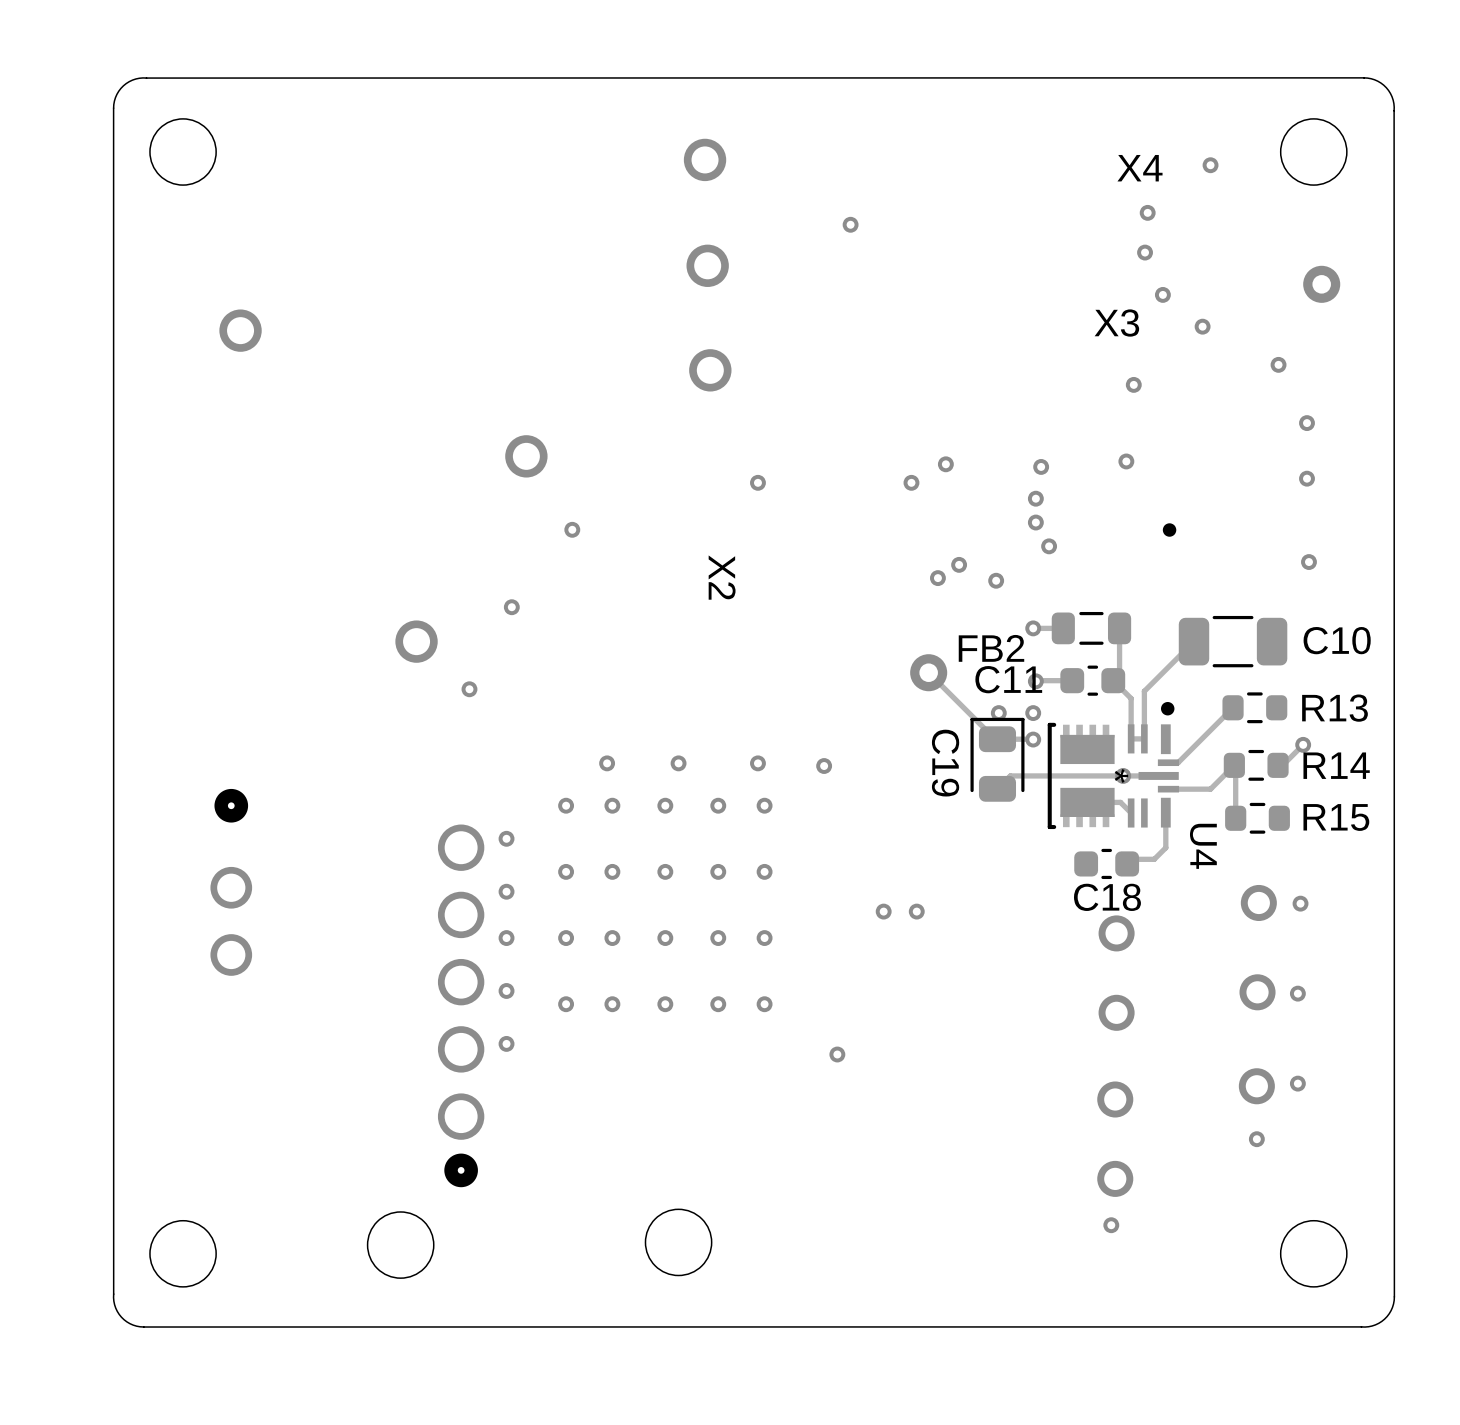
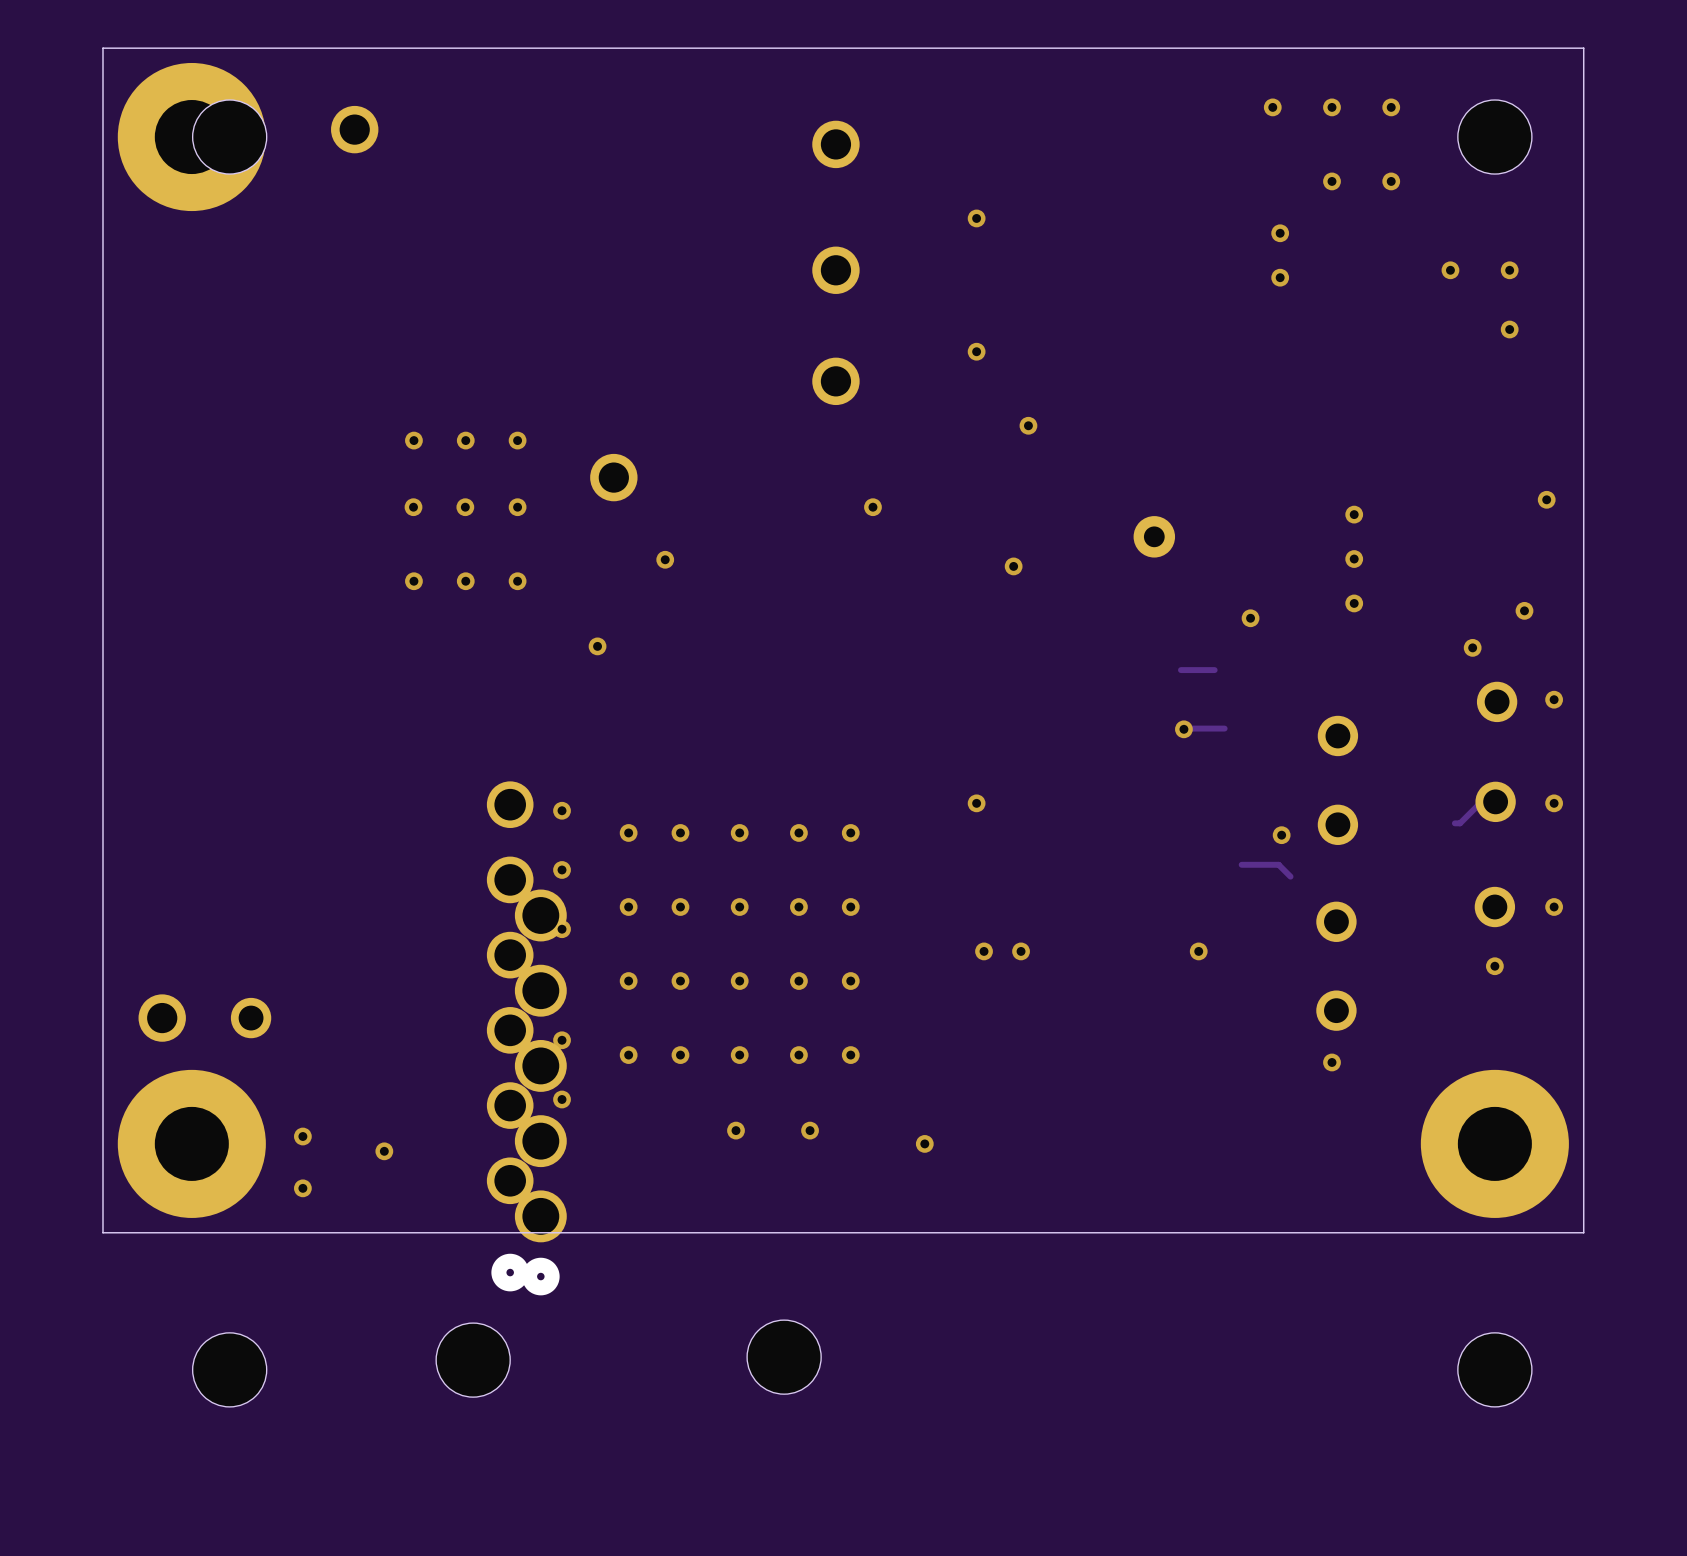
board edge: (1364, 77) (142, 77) (132, 80) (123, 85) (115, 97) (113, 108) (113, 1297) (115, 1308) (121, 1317) (129, 1323) (143, 1327) (1365, 1327) (1375, 1324) (1384, 1319) (1392, 1307) (1394, 1296) (1394, 107) (1392, 96) (1386, 87) (1377, 81) (1364, 77) -> (1583, 48) (1583, 1232) (102, 1232) (102, 48) (1583, 48)
via: none -> (1272, 107)
via: none -> (1332, 107)
via: none -> (1391, 107)
part: none -> (191, 137)
part position: (705, 159) -> (835, 144)
via: (1210, 165) -> none
X4: (1140, 168) -> none
via: none -> (1332, 181)
via: none -> (1391, 181)
via: (1147, 212) -> none
via: none -> (1280, 233)
via: (1145, 252) -> none
part position: (707, 265) -> (835, 270)
via: none -> (1450, 270)
via: none -> (1509, 270)
via: none -> (1280, 277)
part: (1321, 284) -> none
via: (1162, 294) -> none
X3: (1116, 323) -> none
via: none -> (1509, 329)
via: (1202, 326) -> none
part position: (240, 330) -> (354, 129)
via: none -> (976, 351)
via: (1278, 364) -> none
part position: (710, 370) -> (835, 381)
via: (1133, 384) -> none
via: none -> (1028, 425)
via: none -> (413, 440)
via: none -> (465, 440)
via: none -> (517, 440)
via: (1306, 423) -> none
via: (1126, 461) -> none
via: (945, 464) -> none
via: (1041, 466) -> none
via: none -> (1546, 499)
via: (1306, 478) -> none
via: none -> (413, 507)
via: none -> (465, 507)
via: none -> (517, 507)
via: (911, 482) -> none
via: none -> (1354, 514)
via: (1035, 498) -> none
via: (1035, 522) -> none
via: none -> (1354, 559)
part: (1169, 530) -> none
via: none -> (1013, 566)
via: (1049, 546) -> none
via: none -> (413, 581)
via: none -> (465, 581)
via: none -> (517, 581)
via: (1308, 562) -> none
via: (959, 564) -> none
via: none -> (1354, 603)
via: none -> (1524, 610)
X2: (722, 577) -> none
via: (937, 578) -> none
via: (996, 580) -> none
via: none -> (1250, 618)
via: none -> (1472, 647)
via: (1033, 628) -> none
FB2: (1091, 628) -> none
track: (1119, 628) (1119, 674) (1113, 680) (1131, 698) (1131, 738) (1144, 738) (1144, 691) (1194, 641) -> none
part: (416, 641) -> none
C10: (1233, 641) -> none
via: none -> (1554, 699)
part: none -> (1497, 701)
track: (928, 672) (995, 739) (1032, 739) -> none
part position: (928, 672) -> (1154, 536)
C11: (1092, 680) -> none
part: none -> (1337, 735)
via: (469, 689) -> none
track: (1233, 707) (1178, 762) (1168, 762) -> none
R13: (1254, 707) -> none
via: (998, 713) -> none
via: (1033, 713) -> none
via: (1033, 739) -> none
via: (1303, 744) -> none
part: none -> (1495, 801)
via: none -> (1554, 803)
via: none -> (562, 810)
C19: (997, 759) -> none
via: (607, 763) -> none
via position: (678, 763) -> (798, 832)
via: (757, 763) -> none
U4: (1113, 765) -> none
R14: (1256, 765) -> none
via position: (824, 766) -> (976, 803)
part: none -> (1337, 824)
via: none -> (628, 832)
via: none -> (680, 832)
via: none -> (739, 832)
via: none -> (850, 832)
track: (1158, 775) (1010, 775) (997, 788) -> none
track: (1168, 789) (1210, 789) (1234, 765) (1235, 818) -> none
via: (566, 805) -> none
via: (612, 805) -> none
via: (665, 805) -> none
via: (718, 805) -> none
via: (764, 805) -> none
via: none -> (562, 869)
track: (1165, 812) (1165, 847) (1154, 859) (1133, 859) -> none
R15: (1257, 818) -> none
via: (506, 838) -> none
via: none -> (628, 907)
via: none -> (680, 907)
via: none -> (739, 907)
via: none -> (798, 907)
via: none -> (850, 907)
part: none -> (1494, 907)
via: none -> (1554, 907)
part: none -> (1336, 921)
via: none -> (562, 929)
C18: (1106, 863) -> none
via: (566, 871) -> none
via: (612, 871) -> none
via: (665, 871) -> none
via: (718, 871) -> none
via: (764, 871) -> none
via: none -> (984, 951)
via: none -> (1021, 951)
via: none -> (1198, 951)
part: (231, 882) -> none
via: (506, 891) -> none
part: (1258, 902) -> none
via position: (1300, 903) -> (1494, 966)
via: none -> (628, 981)
via: none -> (680, 981)
via: none -> (739, 981)
via: none -> (798, 981)
via: none -> (850, 981)
via: (883, 911) -> none
via: (916, 911) -> none
part: none -> (1336, 1010)
part: (1116, 933) -> none
via: (506, 938) -> none
via: (566, 938) -> none
via: (612, 938) -> none
via: (665, 938) -> none
via: (718, 938) -> none
via: (764, 938) -> none
part: none -> (162, 1018)
part: none -> (251, 1018)
part: none -> (510, 1036)
via: none -> (562, 1040)
via: none -> (628, 1055)
via: none -> (680, 1055)
via: none -> (739, 1055)
via: none -> (798, 1055)
via: none -> (850, 1055)
via: none -> (1332, 1062)
via: (506, 990) -> none
part: (1257, 992) -> none
via: (1297, 993) -> none
via: (566, 1004) -> none
via: (612, 1004) -> none
via: (665, 1004) -> none
via: (718, 1004) -> none
via: (764, 1004) -> none
via: none -> (562, 1099)
part: (1116, 1012) -> none
via: none -> (736, 1130)
via: none -> (810, 1130)
via: (506, 1043) -> none
via: none -> (302, 1136)
part: none -> (191, 1143)
via: none -> (924, 1143)
part: none -> (1494, 1143)
via: (837, 1054) -> none
via: none -> (384, 1151)
via: (1297, 1083) -> none
part: (1256, 1086) -> none
via: none -> (302, 1188)
part: (1115, 1099) -> none
via: (1256, 1139) -> none
part: (1115, 1178) -> none
via: (1111, 1225) -> none

